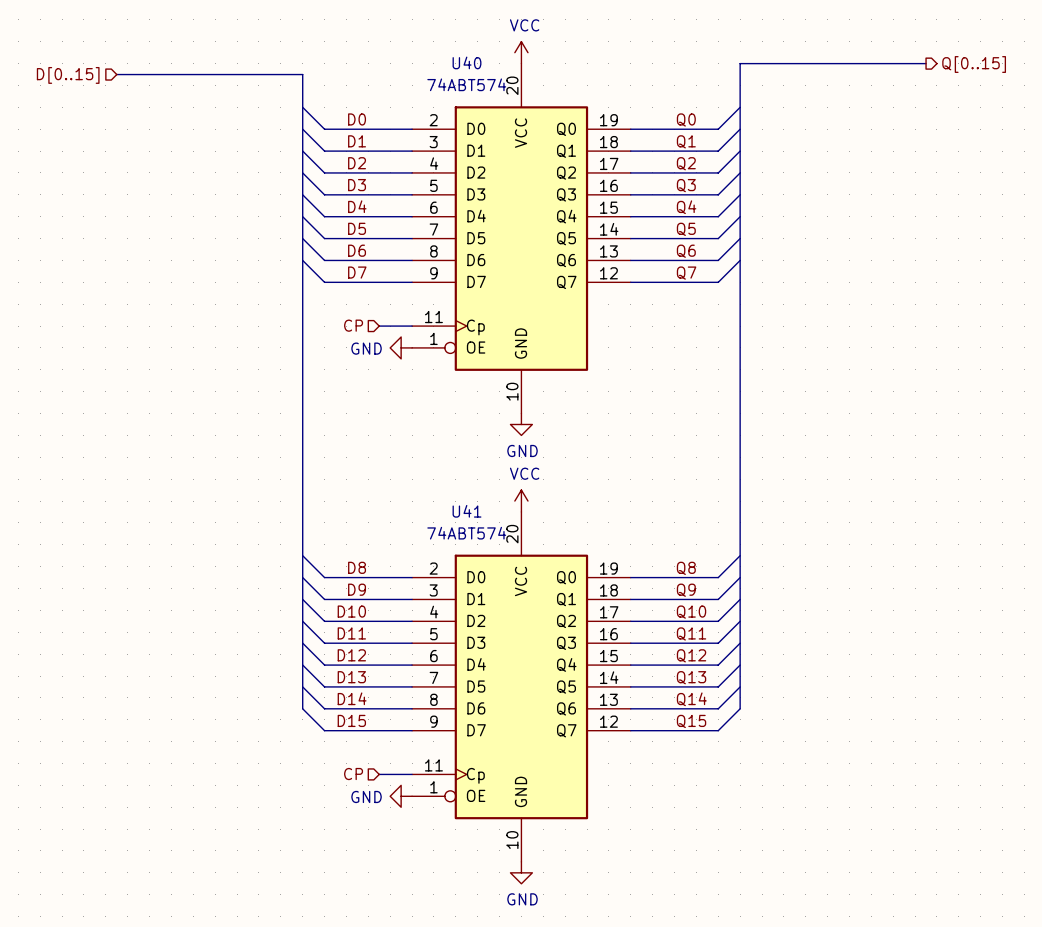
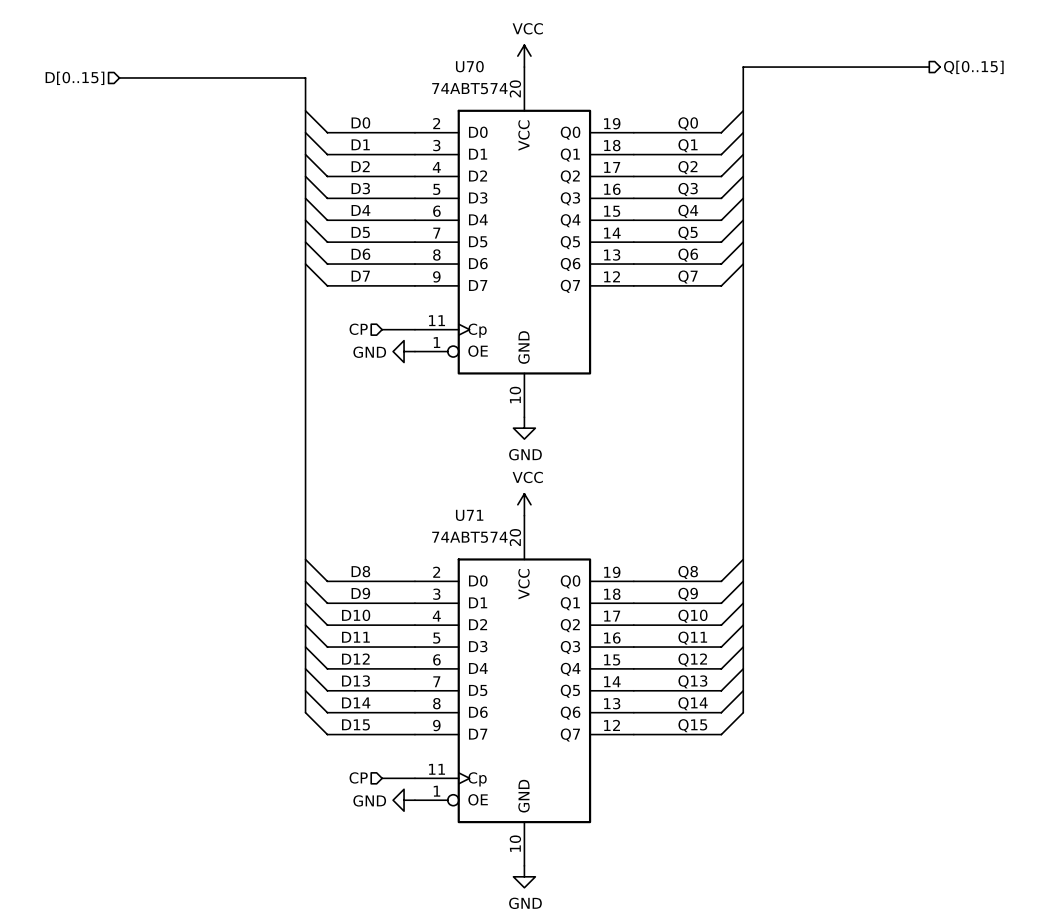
U40 name: U40 (467, 62) -> U70 (469, 66)
U41 name: U41 (467, 511) -> U71 (469, 515)

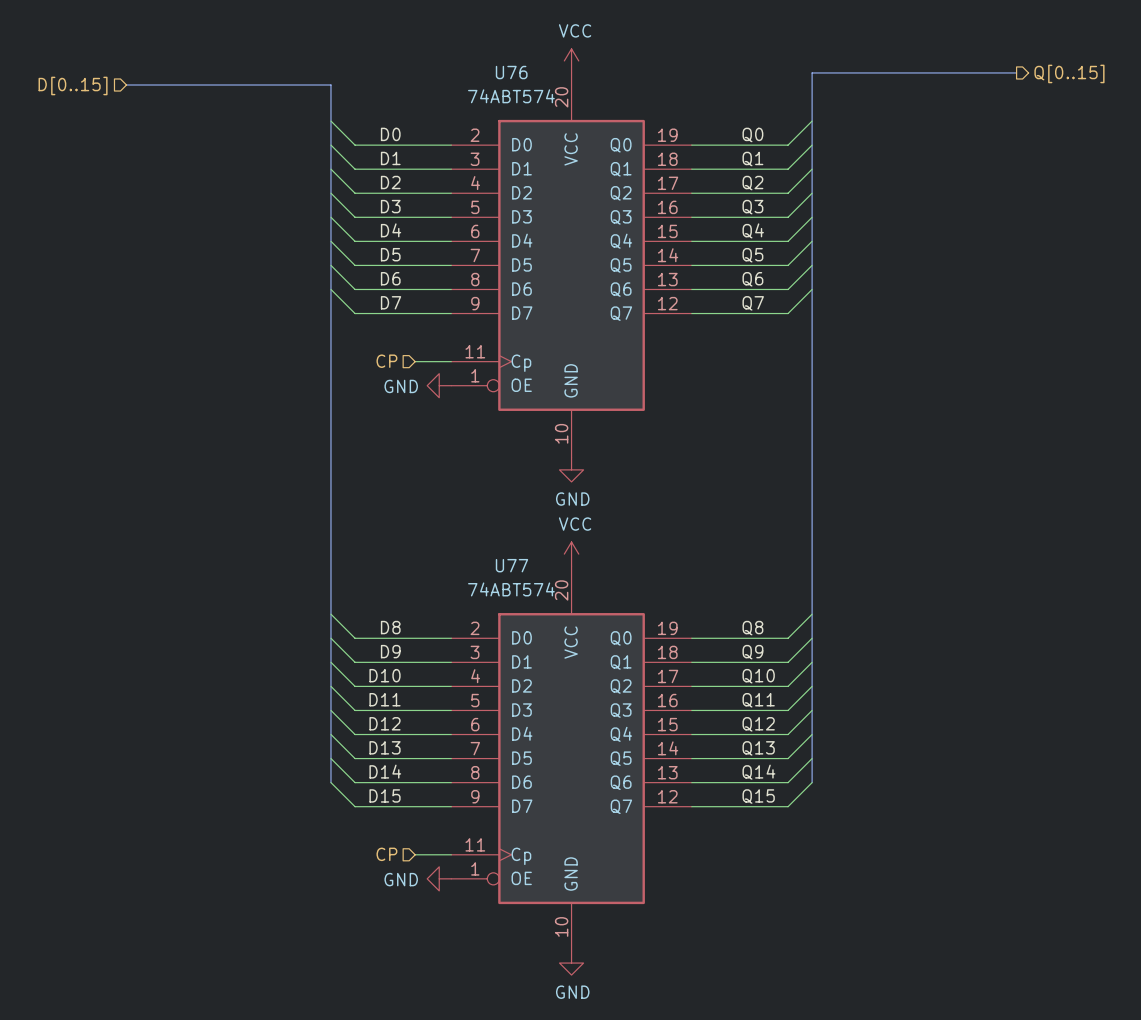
U70 name: U70 (469, 66) -> U76 (511, 72)
U71 name: U71 (469, 515) -> U77 (511, 565)

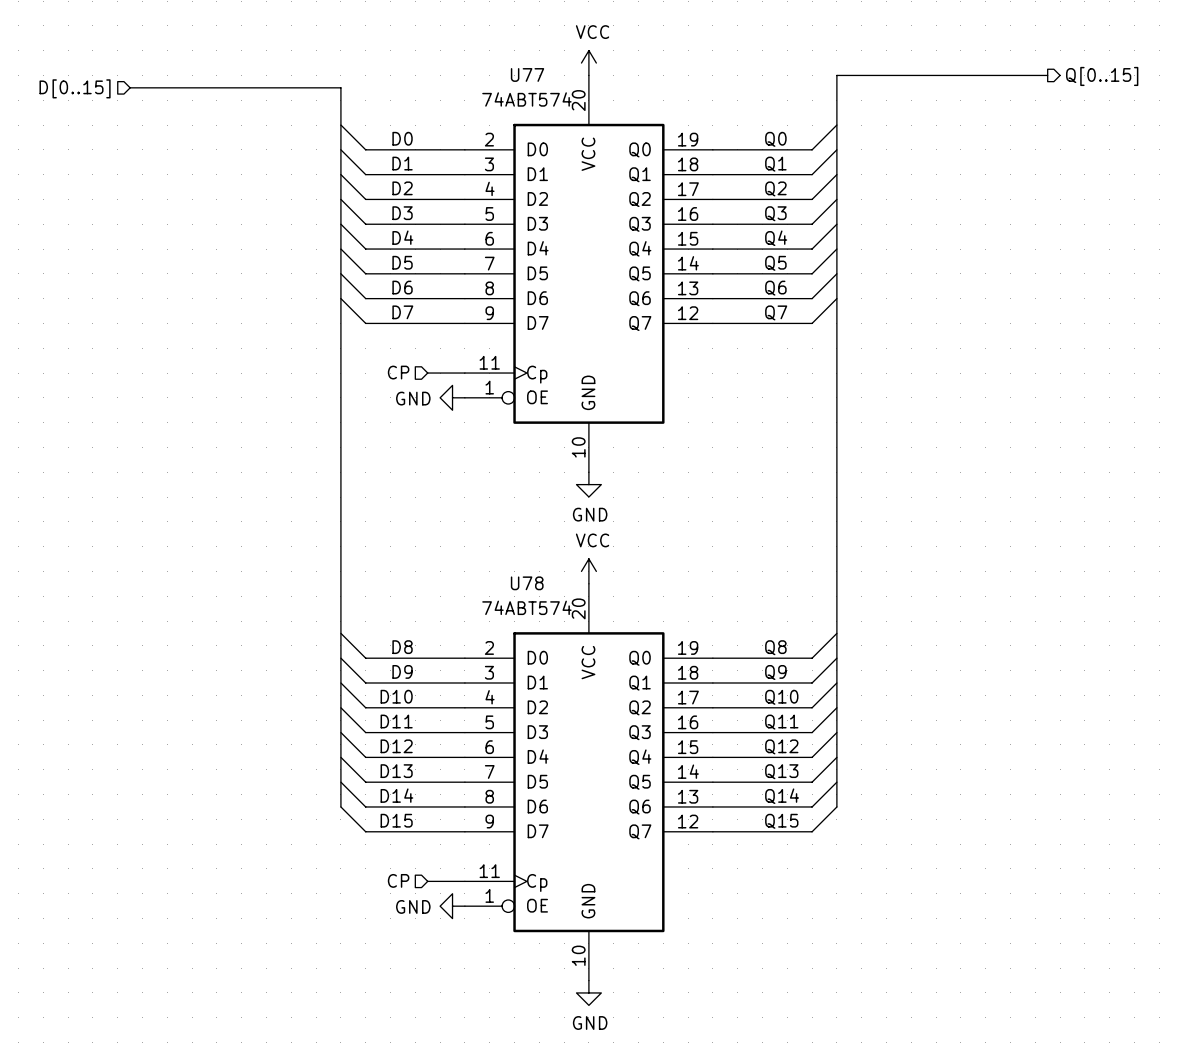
U76 name: U76 (511, 72) -> U77 (527, 74)
U77 name: U77 (511, 565) -> U78 (527, 583)

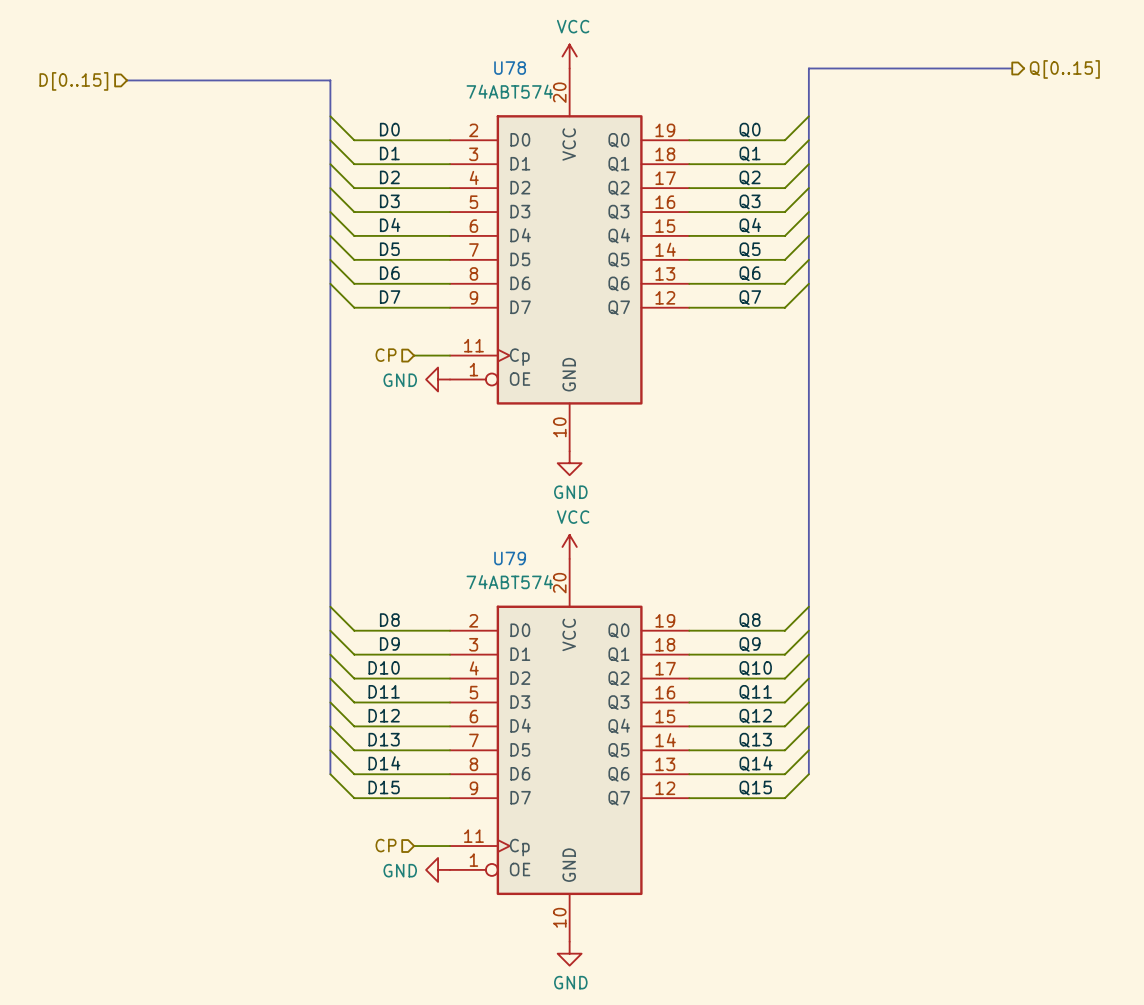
U77 name: U77 (527, 74) -> U78 (510, 68)
U78 name: U78 (527, 583) -> U79 (510, 558)

